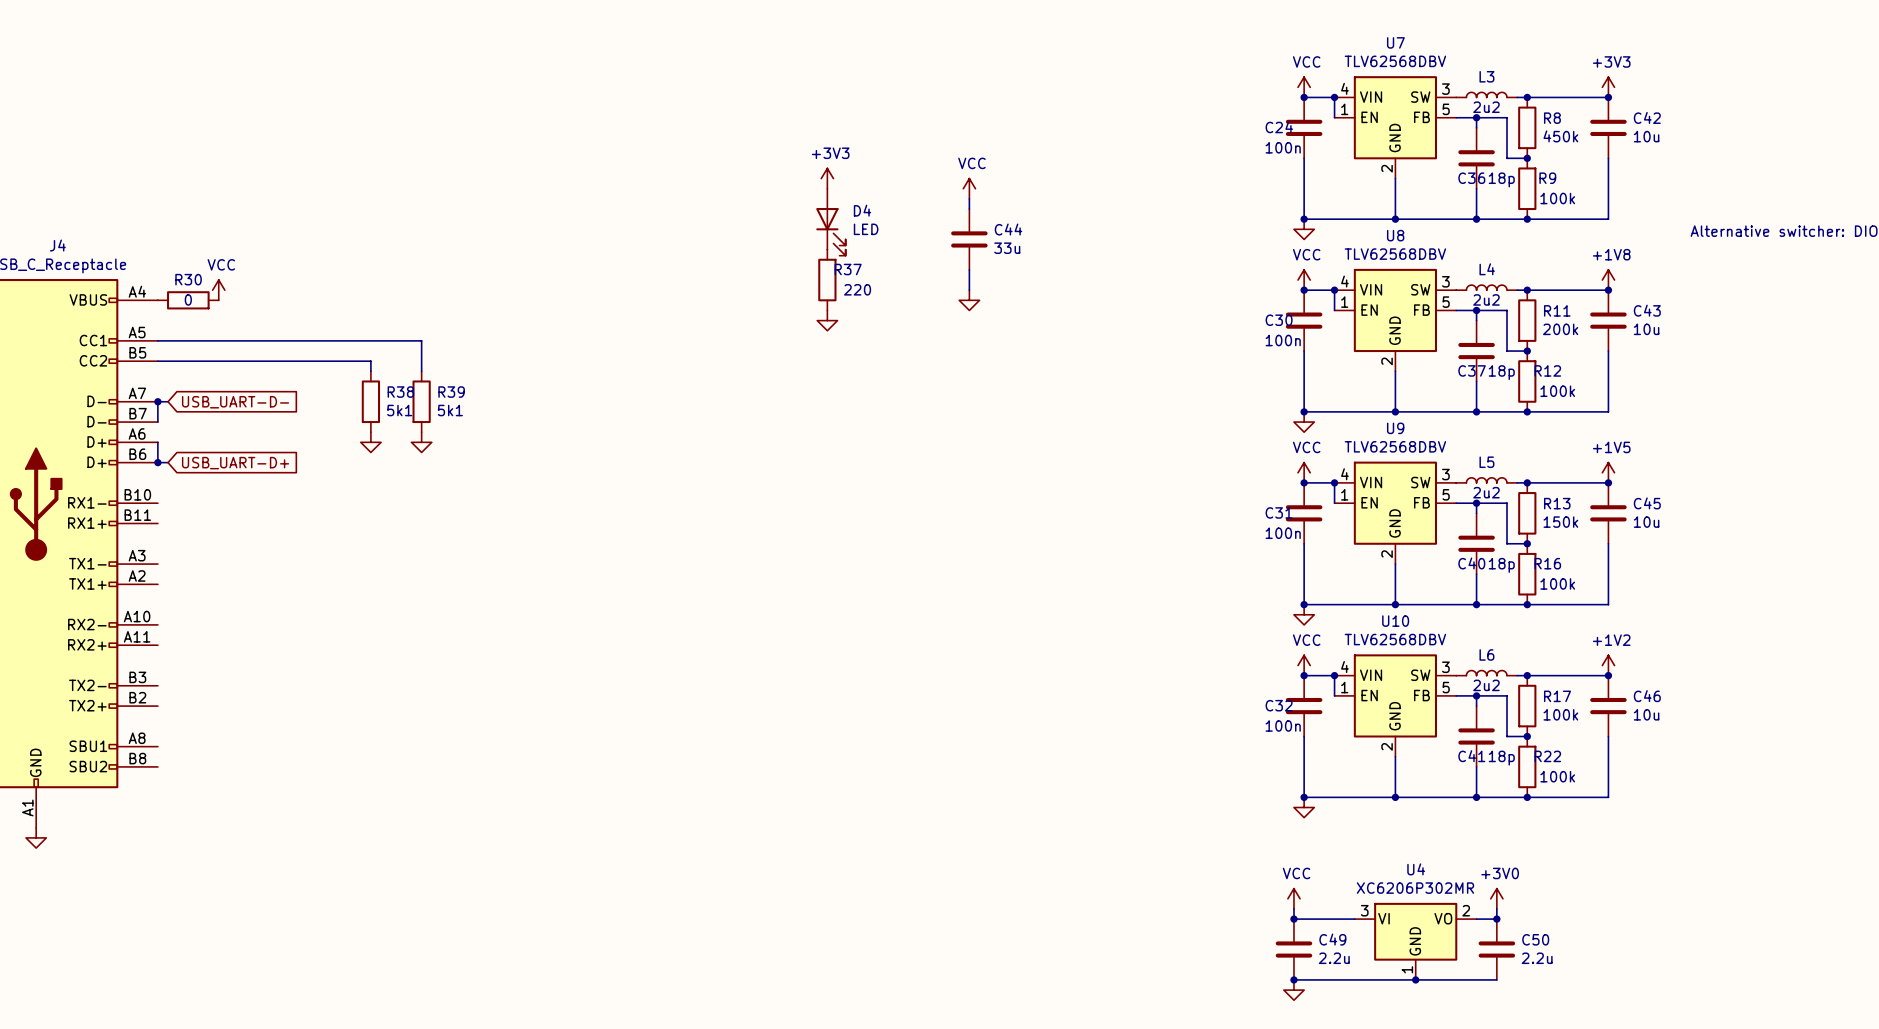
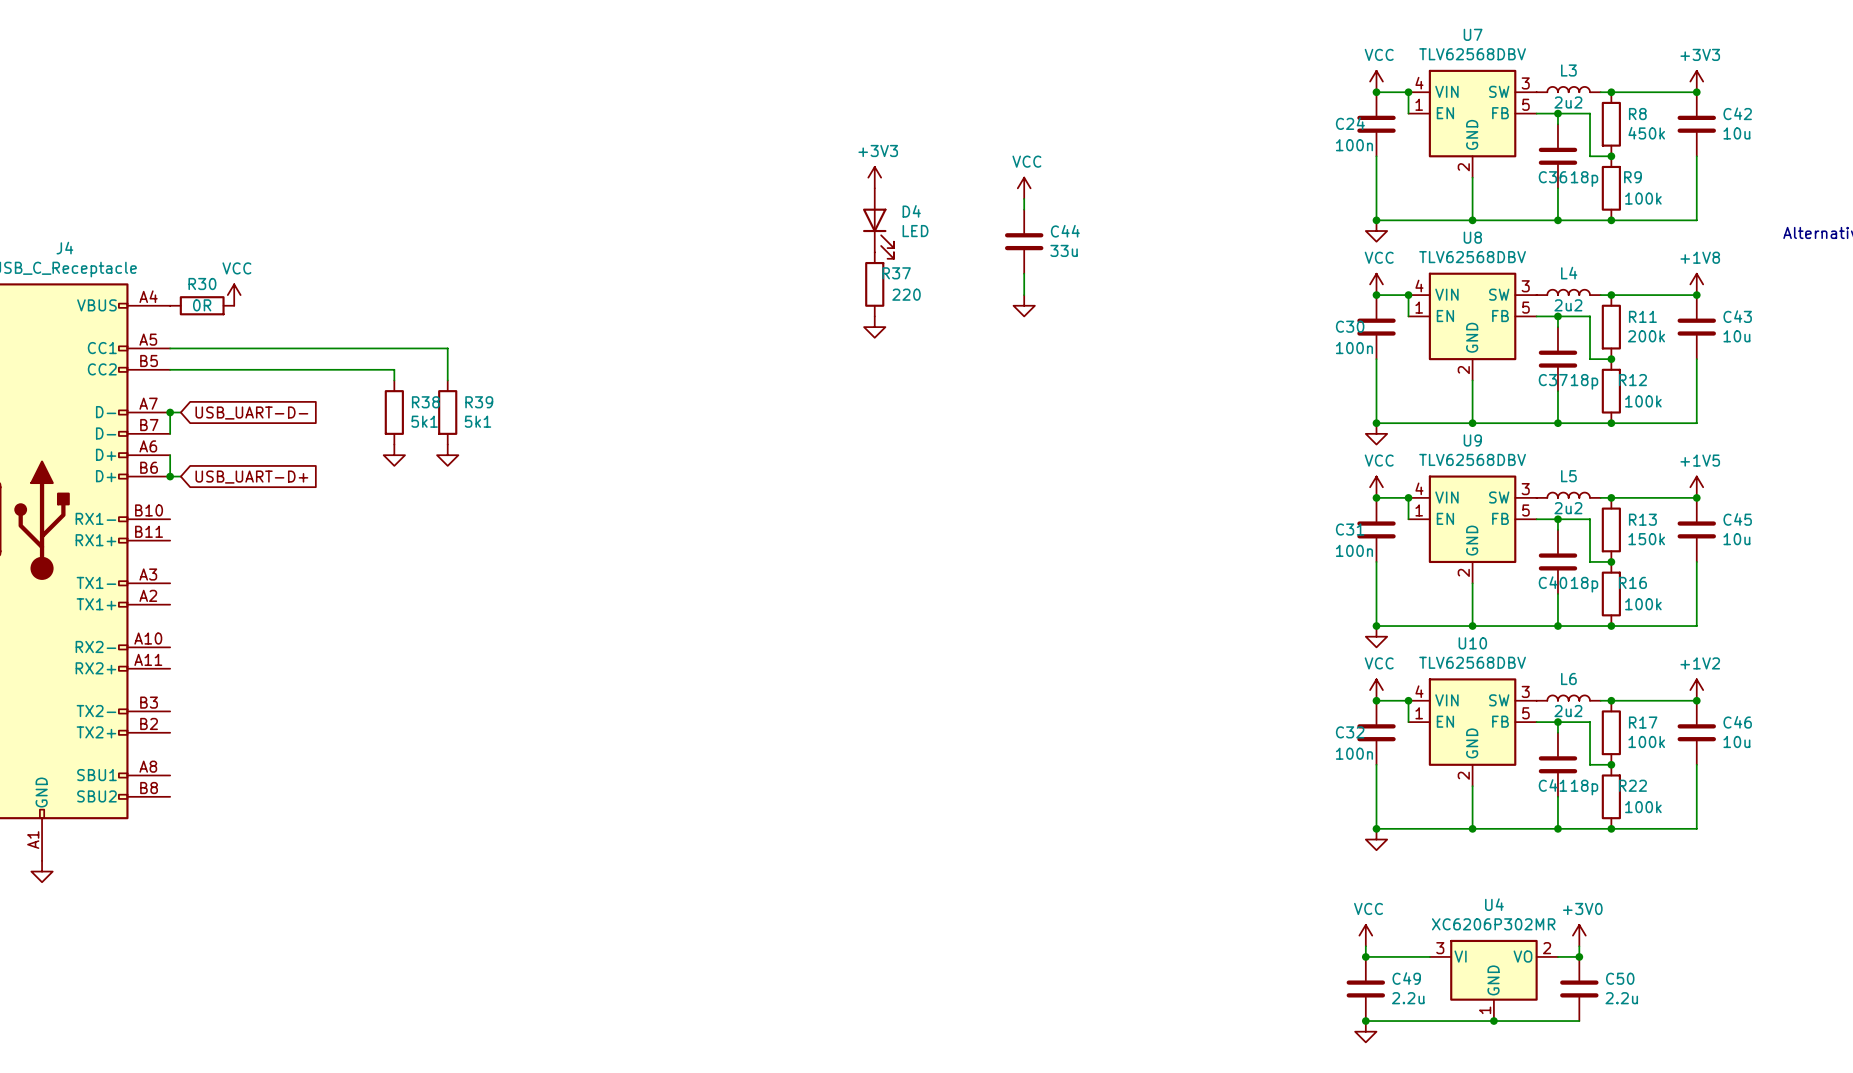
R30 value: 0 (188, 299) -> 0R (202, 305)

